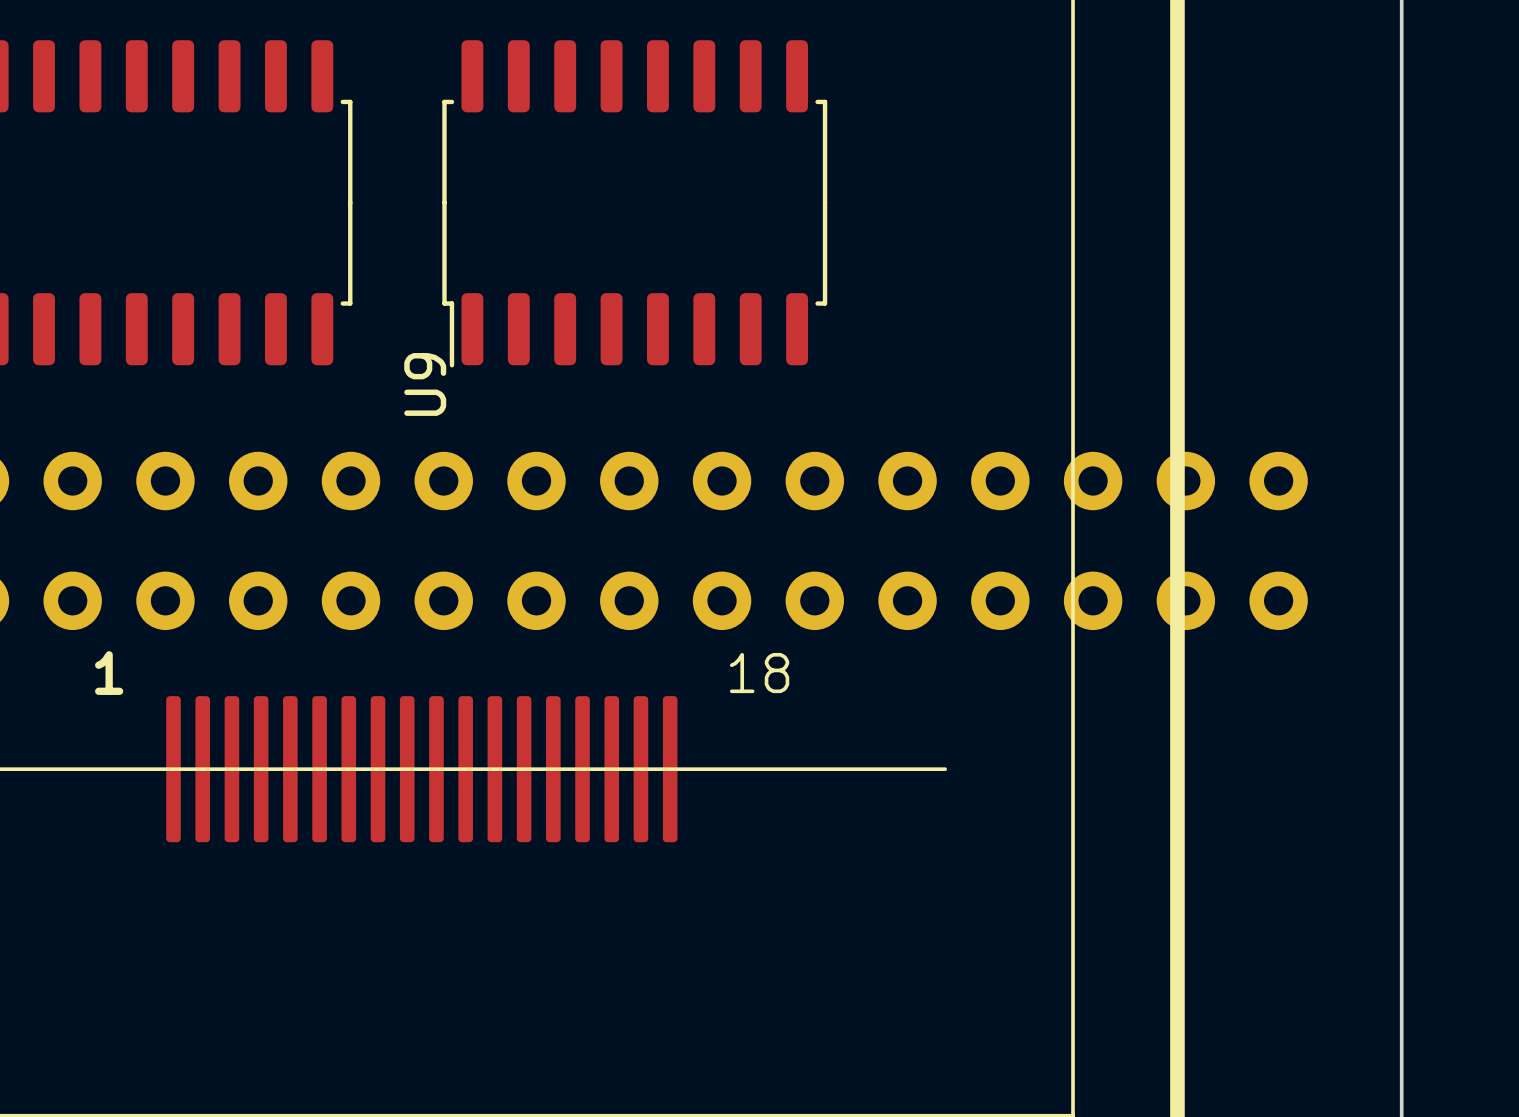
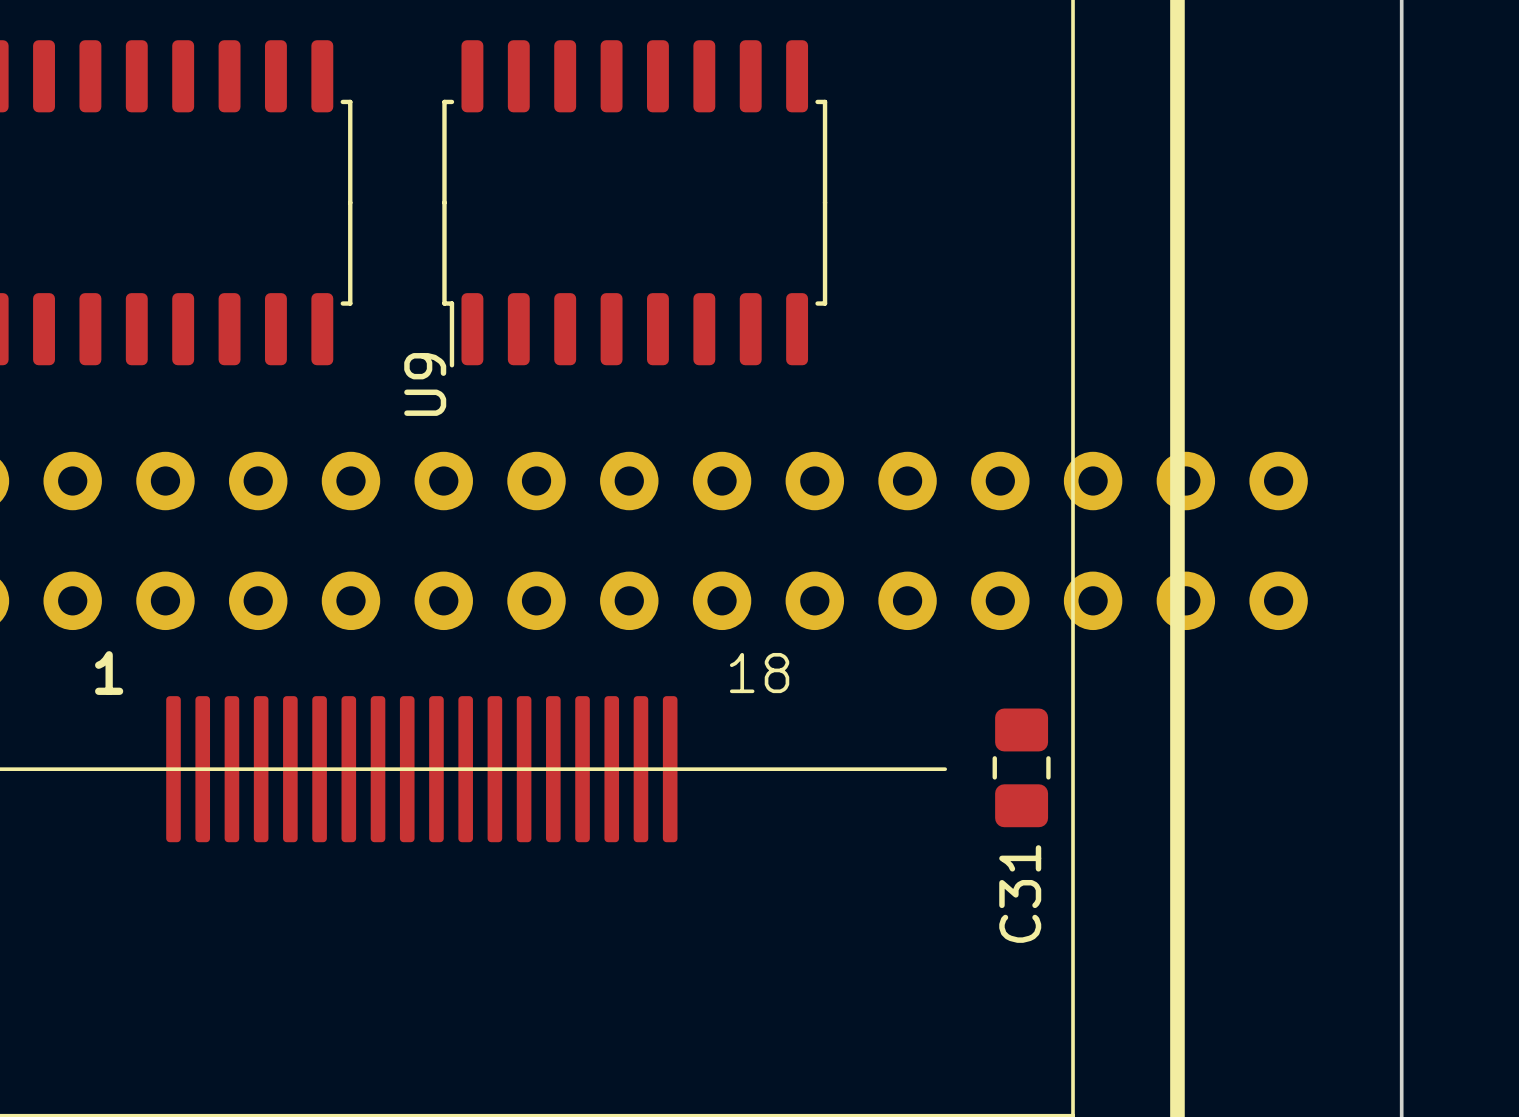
C31: none -> (1021, 767)

